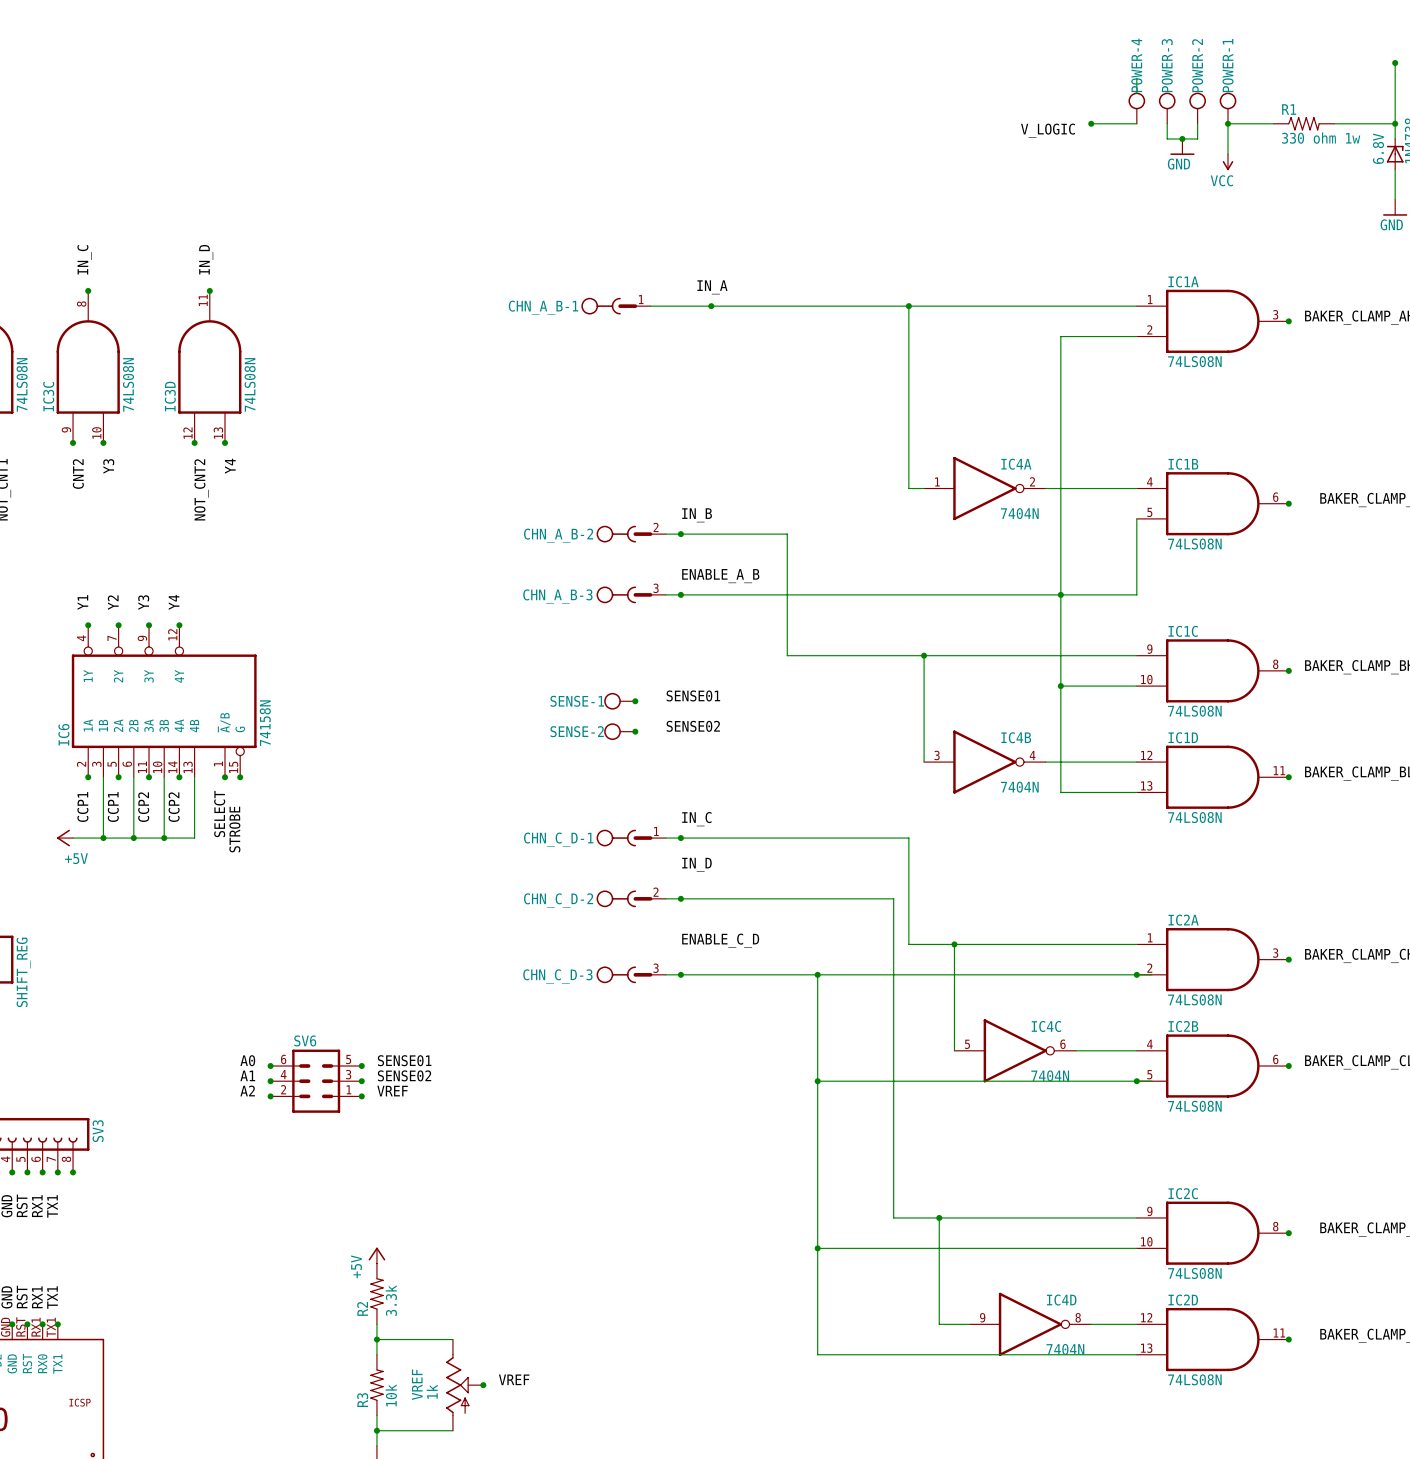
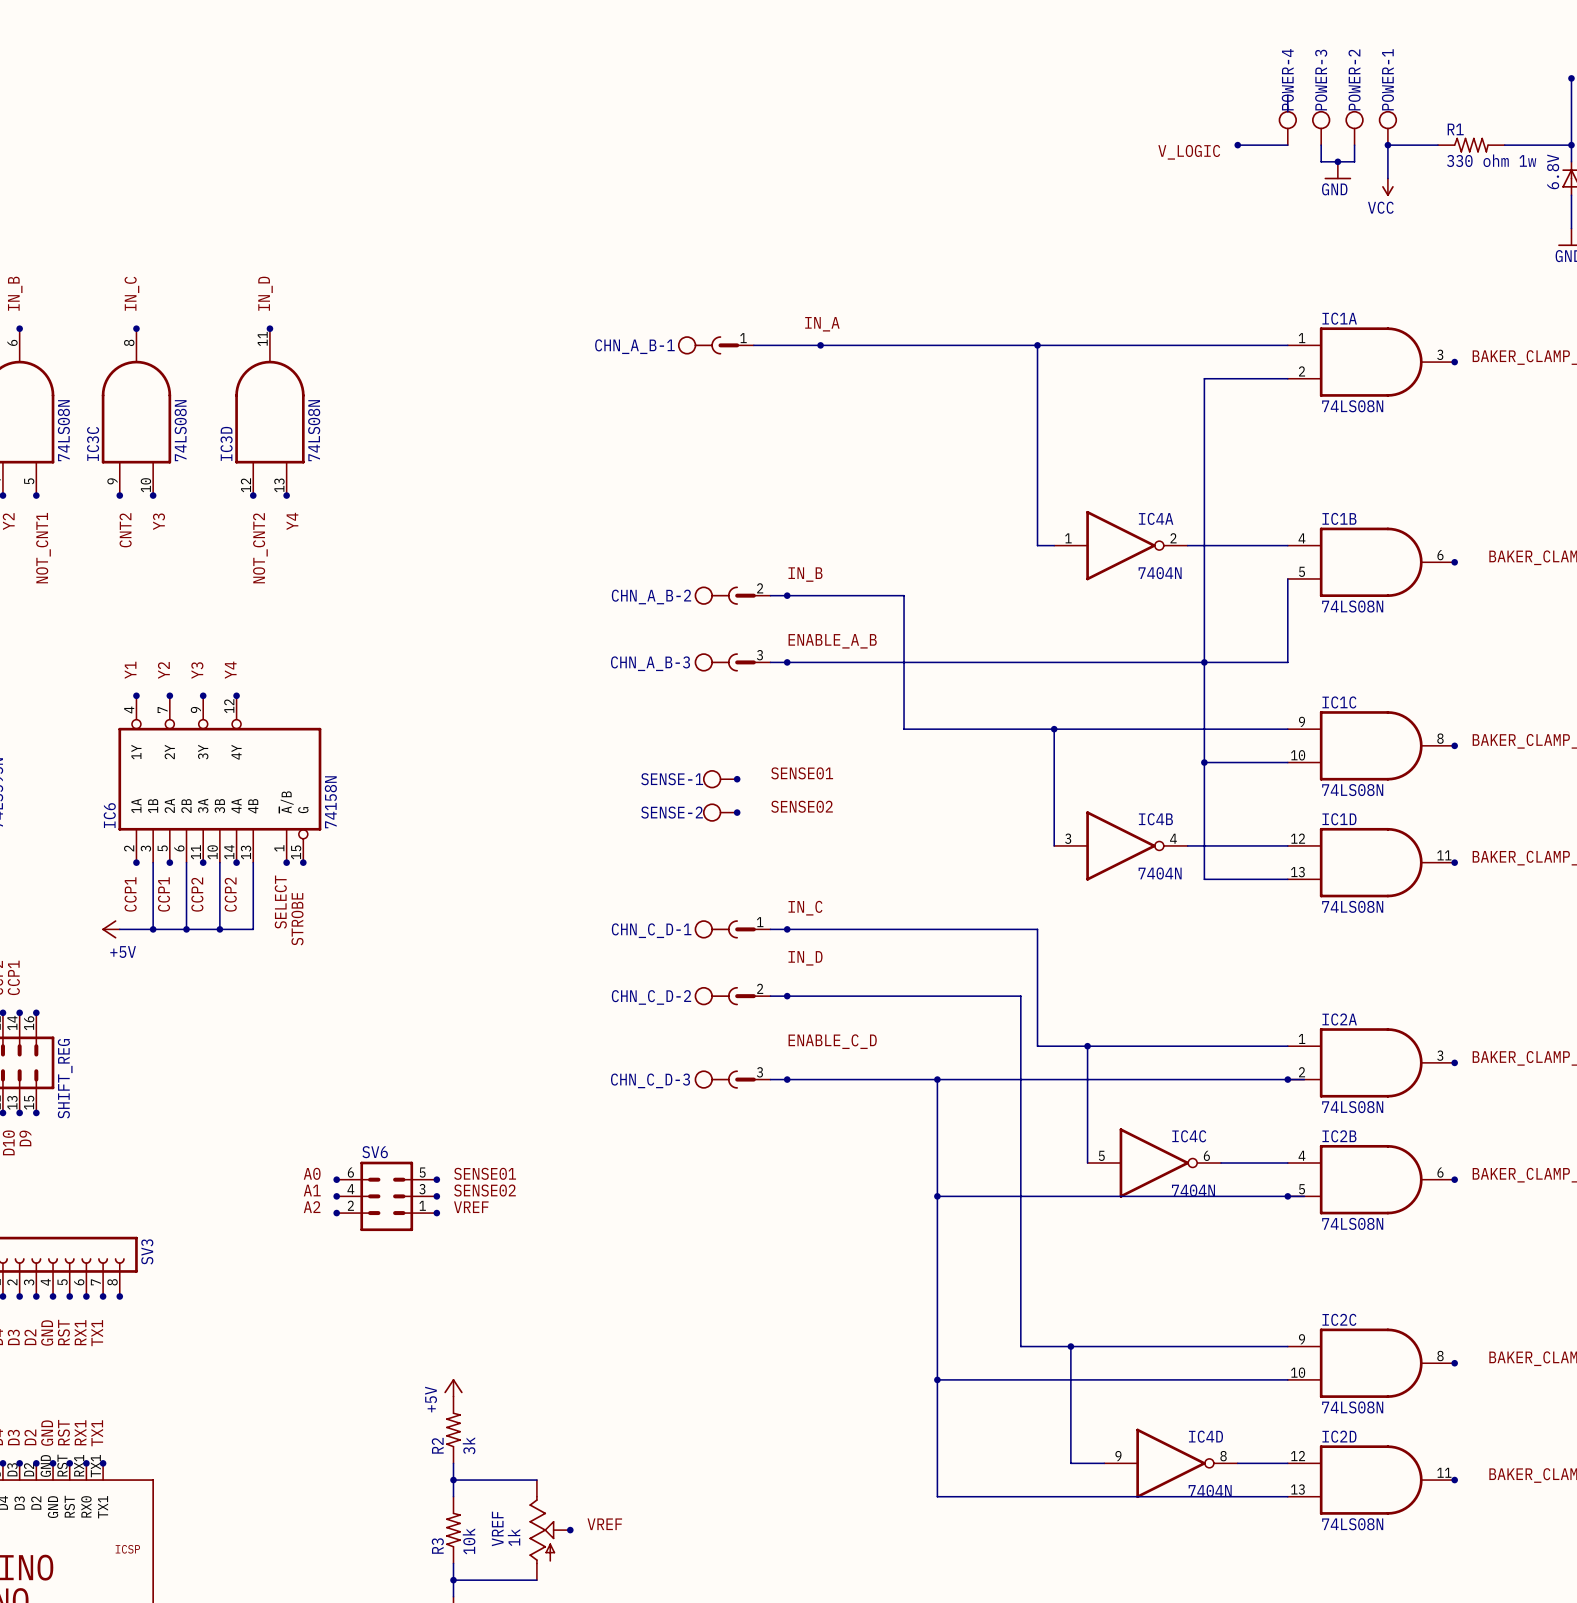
R2 value: 3.3k (391, 1300) -> 3k (469, 1445)

